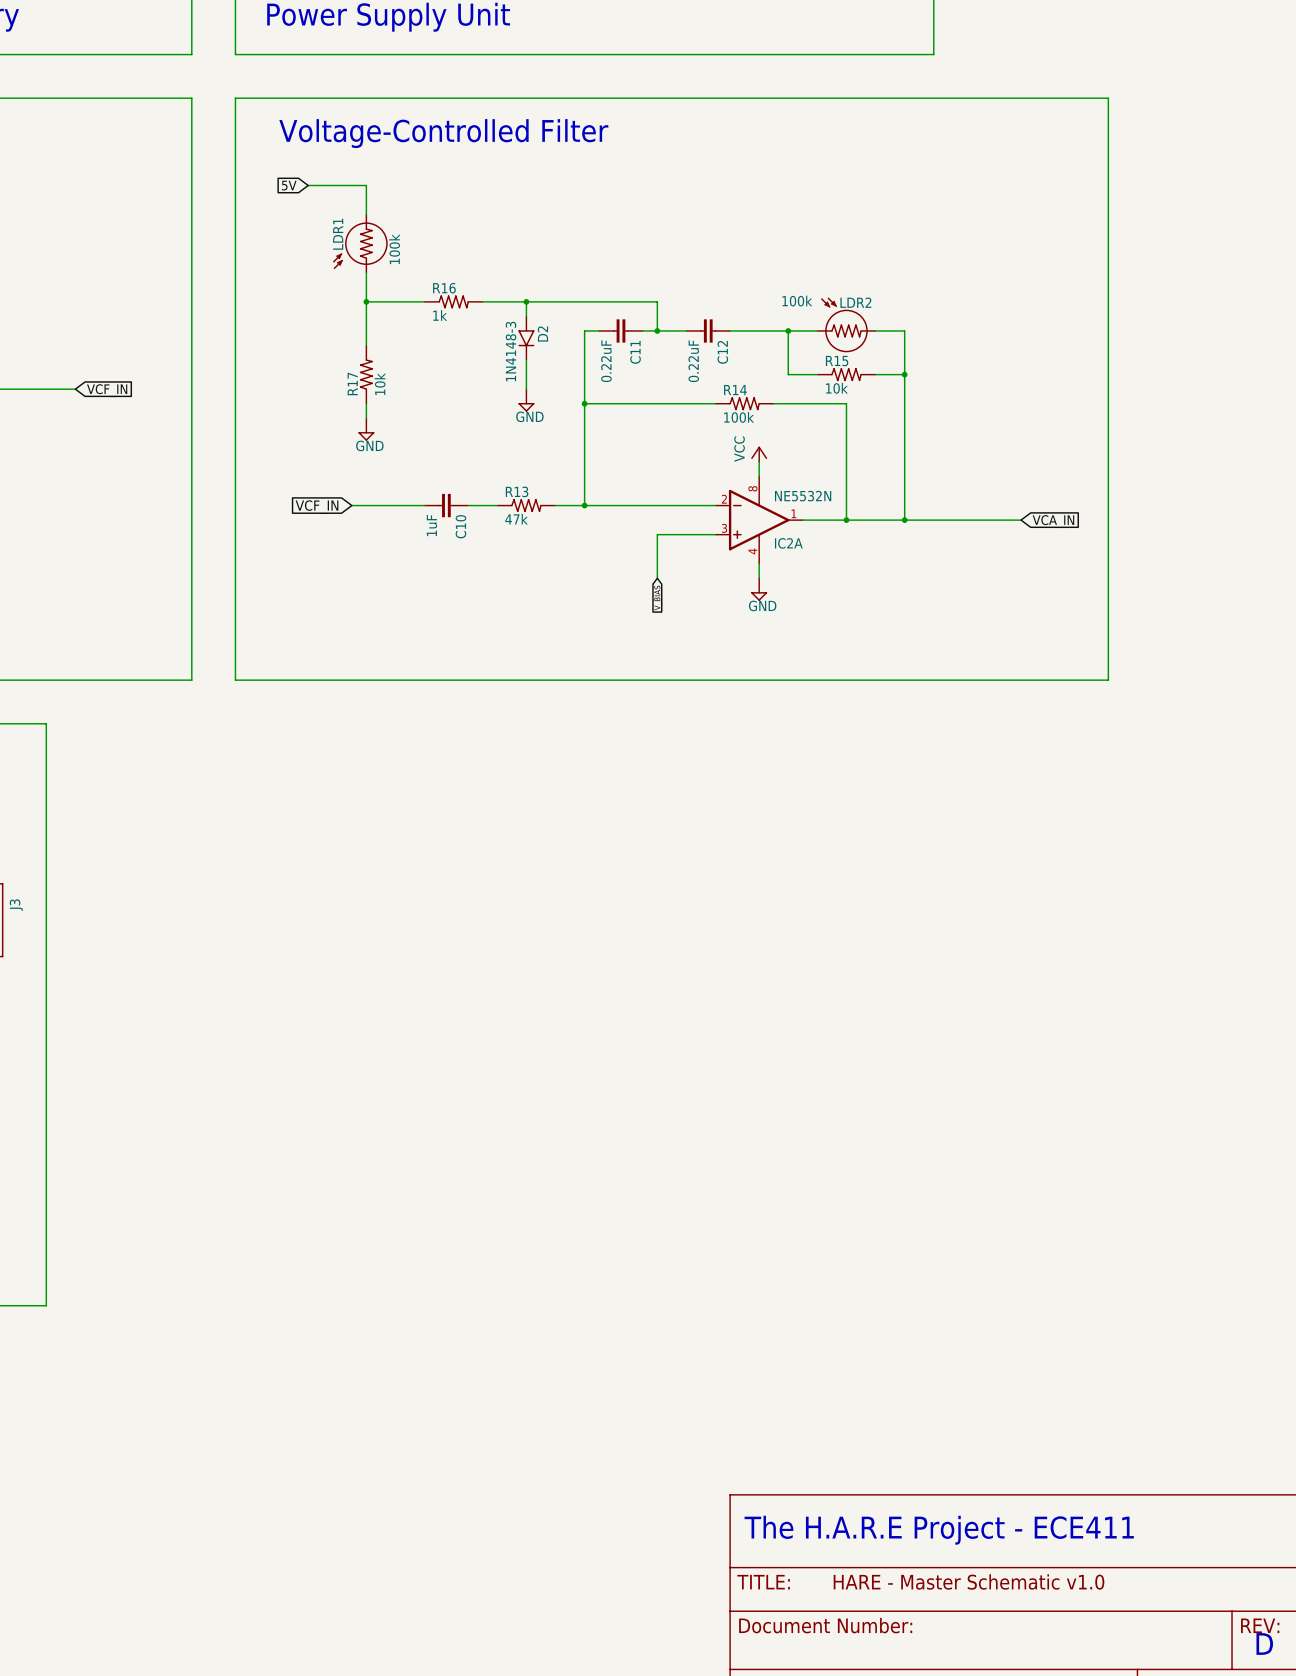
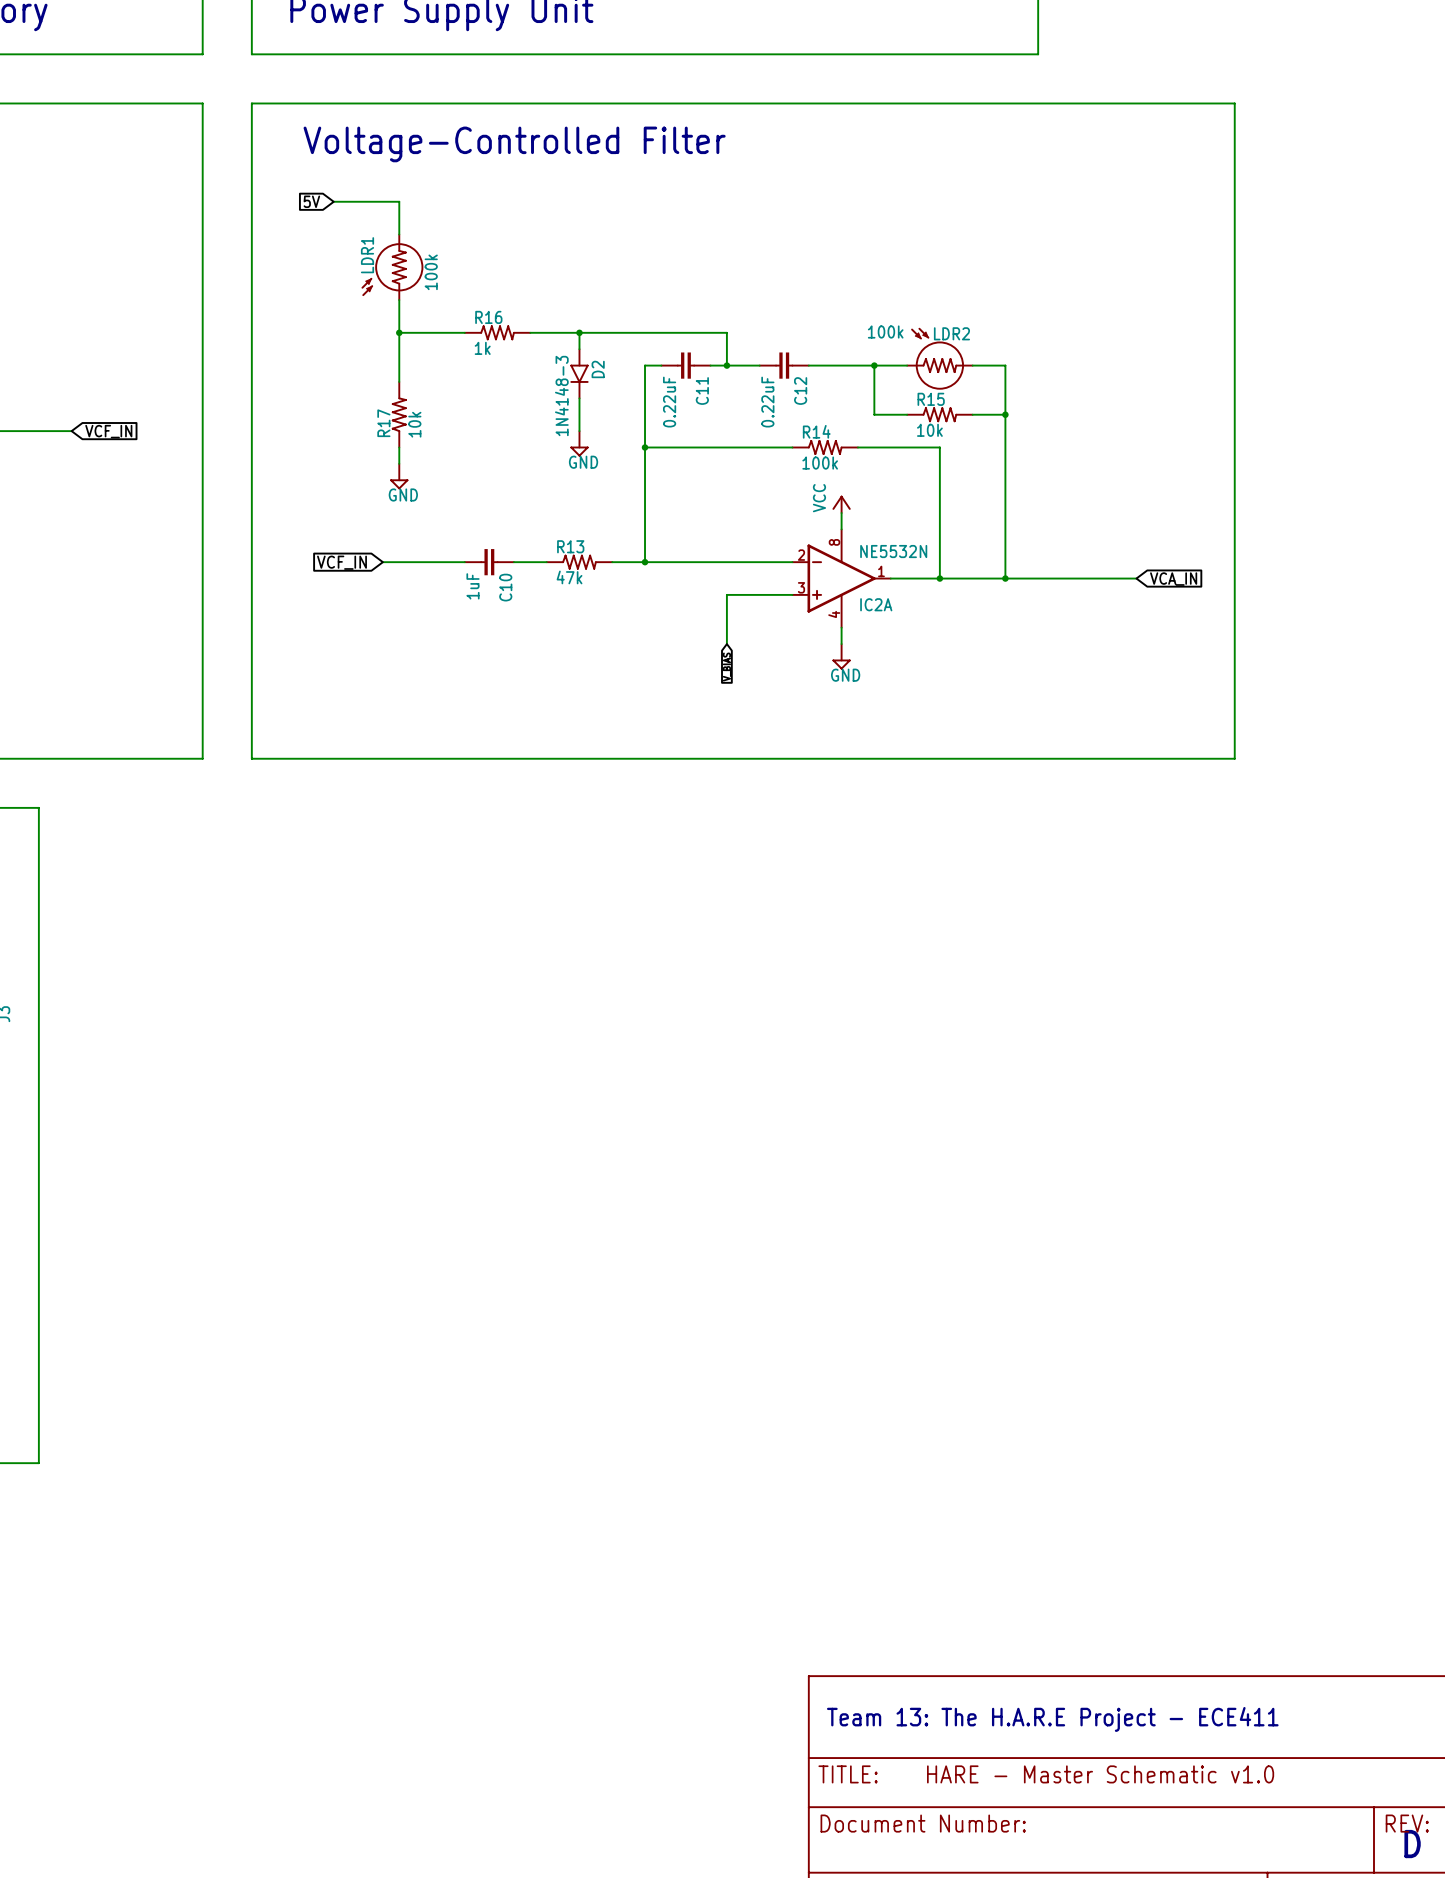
text: The H.A.R.E Project - ECE411 (939, 1530) -> Team 13: The H.A.R.E Project - ECE411 (1052, 1719)

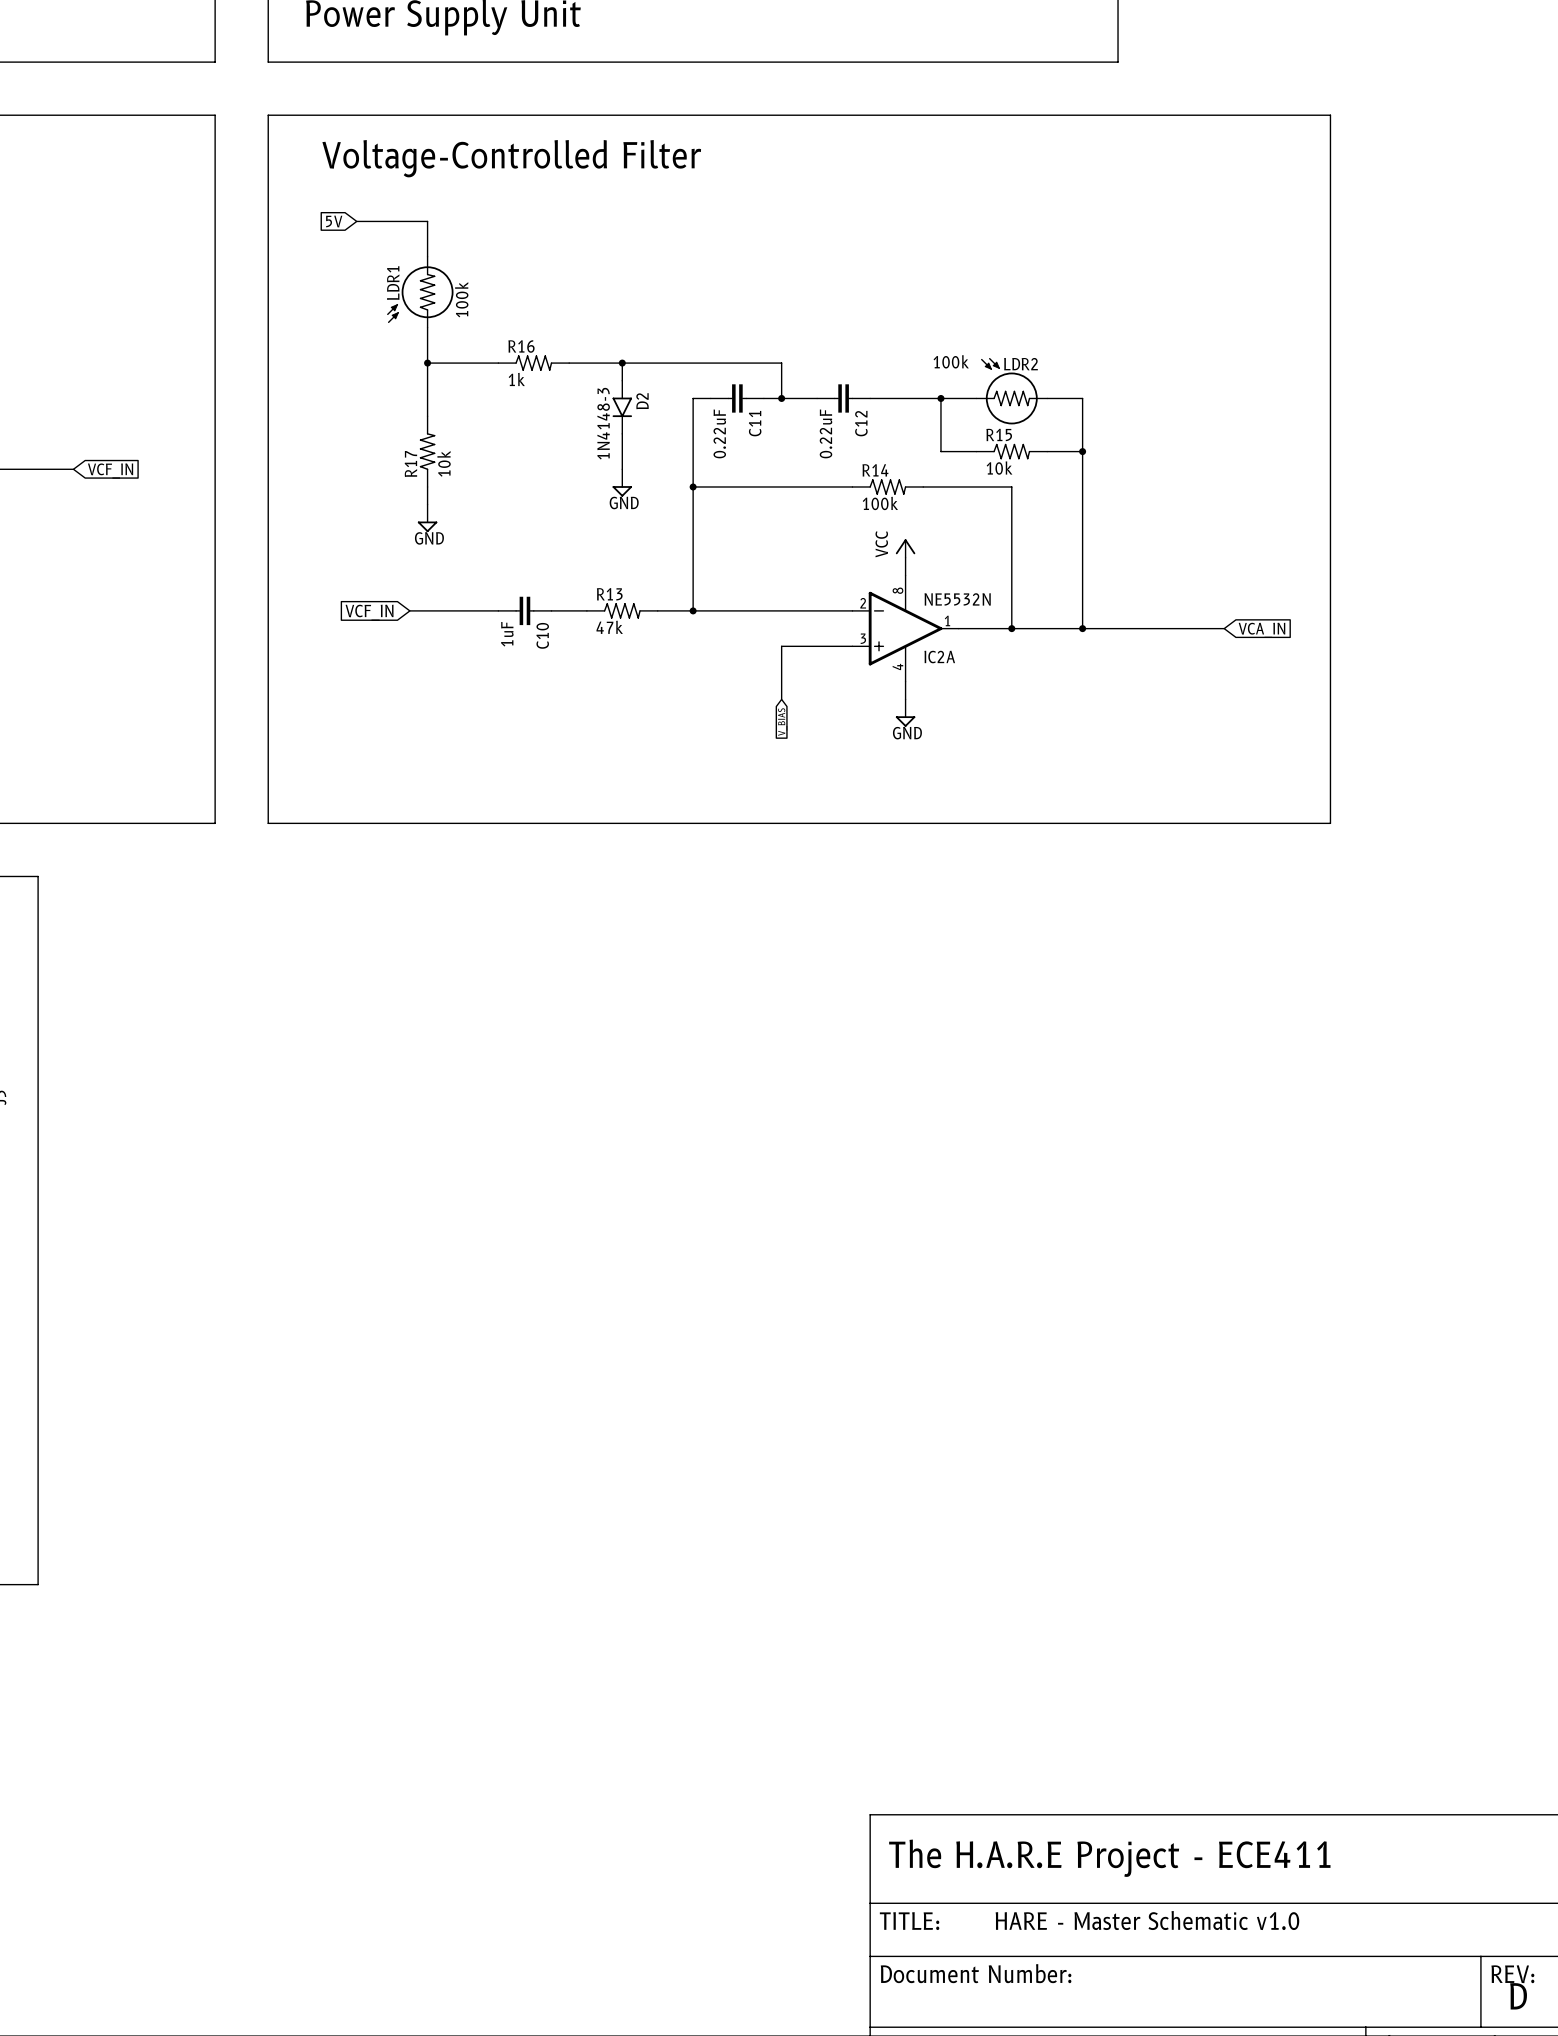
text: Team 13: The H.A.R.E Project - ECE411 (1052, 1719) -> The H.A.R.E Project - ECE411 (1109, 1858)

